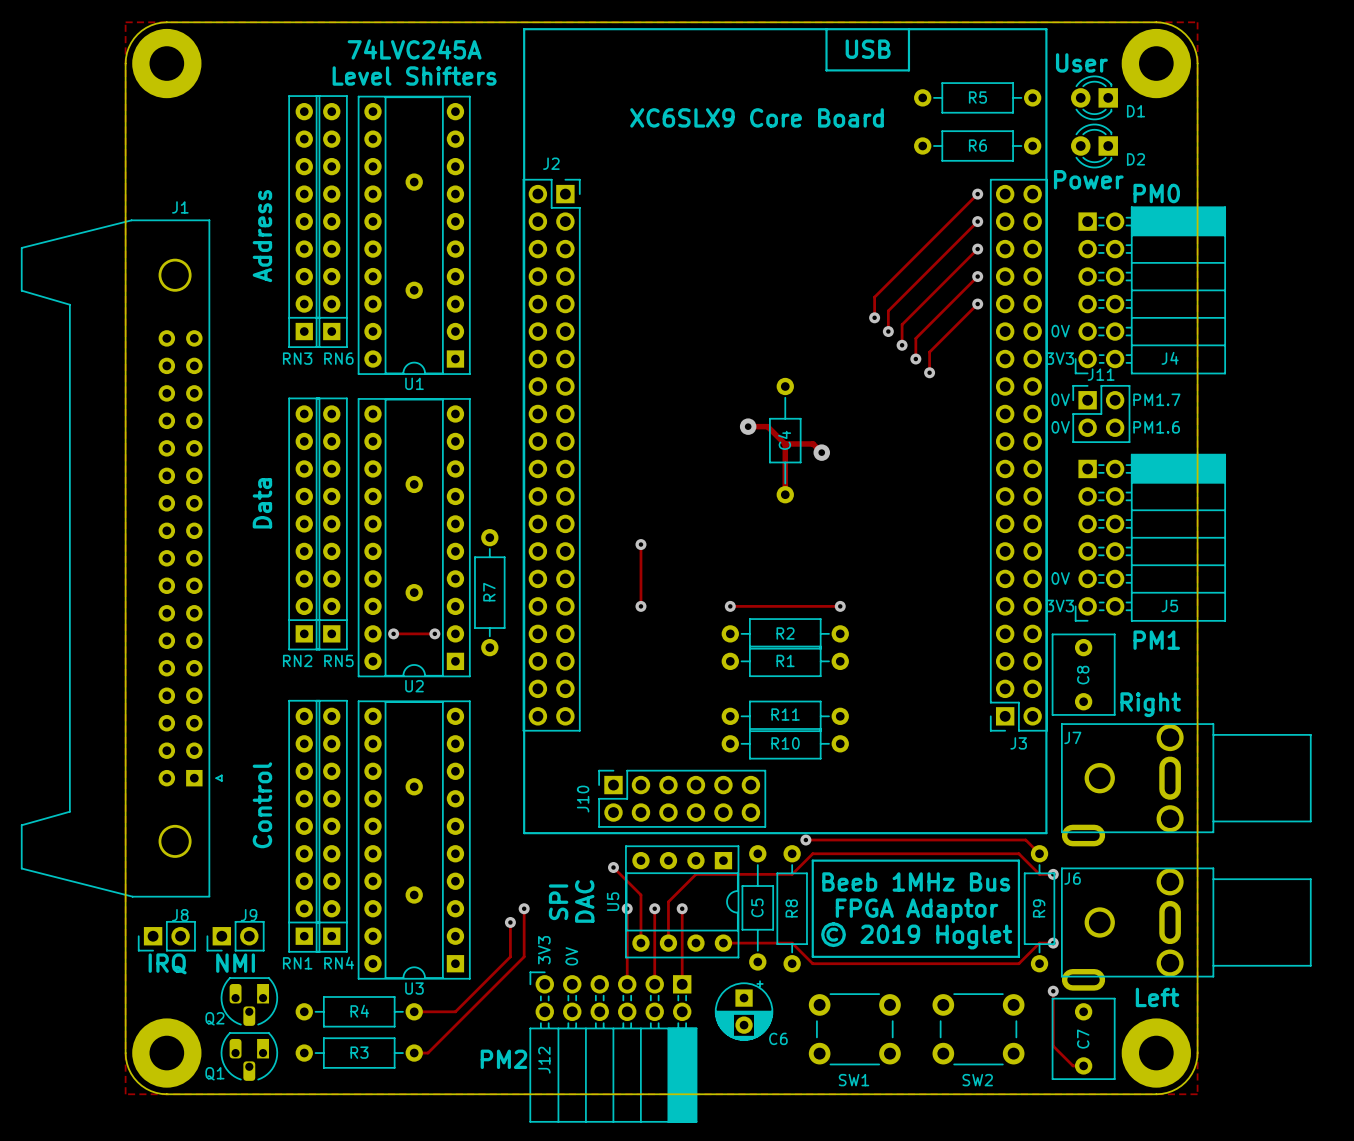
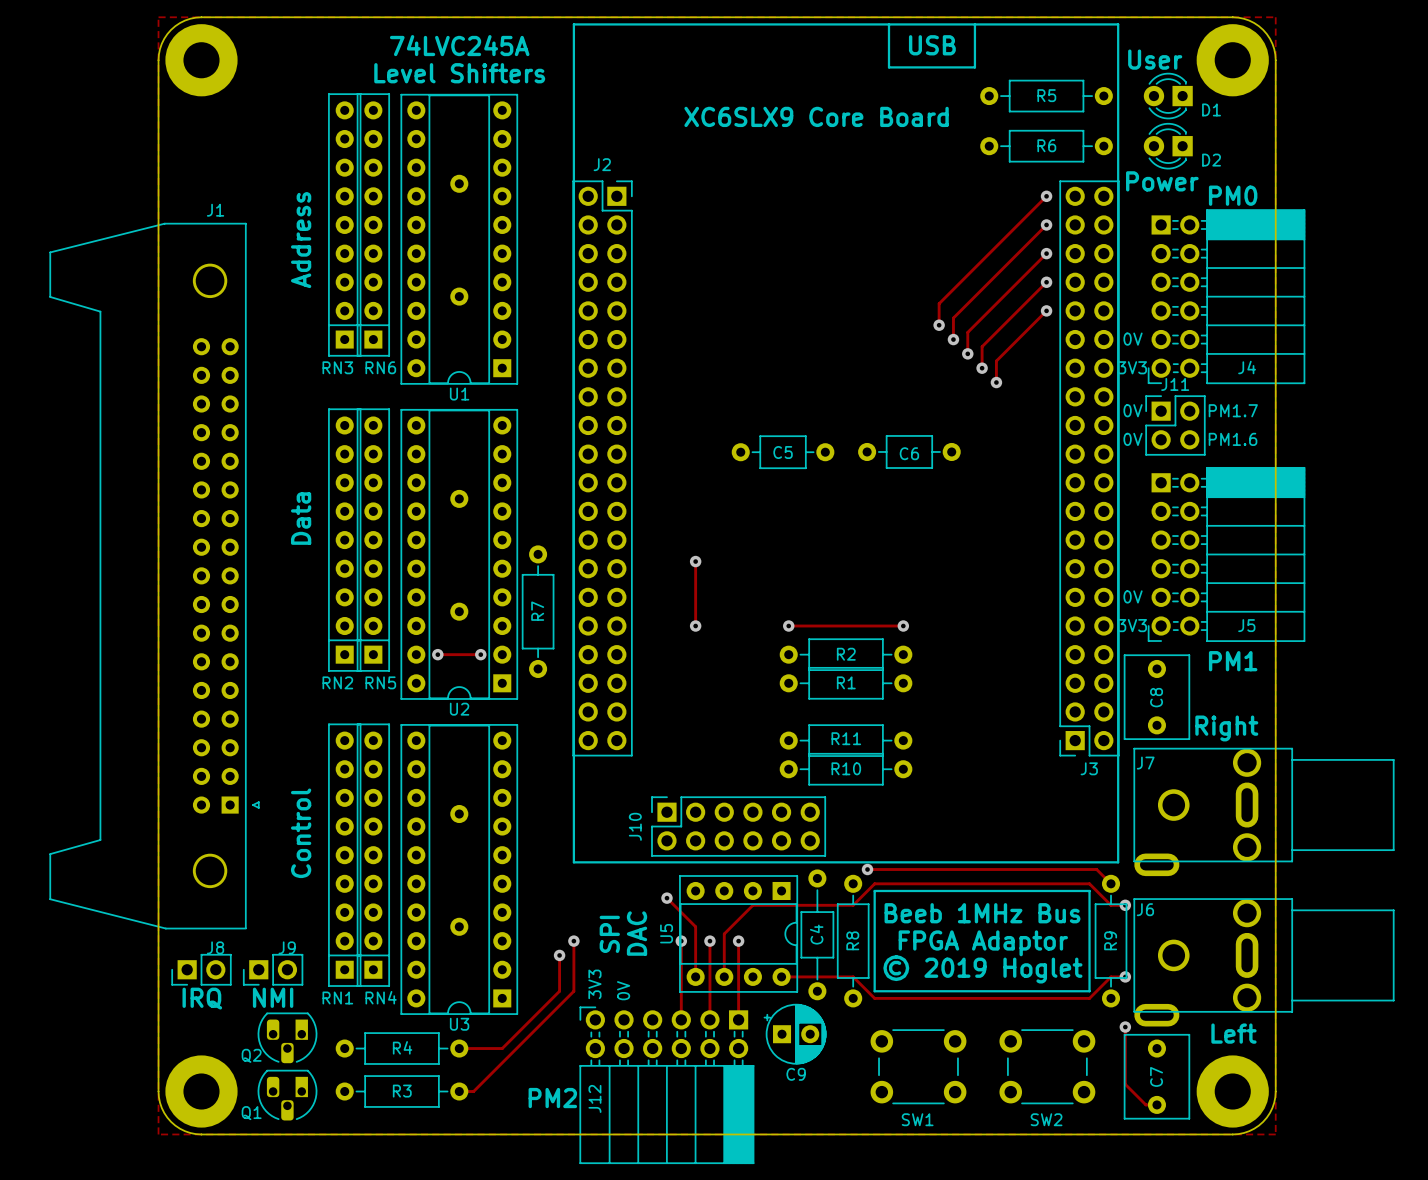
track: (748, 426) (767, 426) (785, 444) -> none
via: (748, 426) -> none
C4 position: (785, 440) -> (817, 934)
track: (785, 444) (785, 494) -> none
track: (785, 444) (813, 443) (821, 452) -> none
via: (821, 452) -> none
C5 footprint: [741, 845, 774, 971] -> [731, 435, 835, 469]
C6 footprint: [715, 980, 774, 1041] -> [858, 435, 961, 469]
C9: none -> (795, 1034)
C6 name position: C6 (778, 1038) -> C6 (909, 453)

